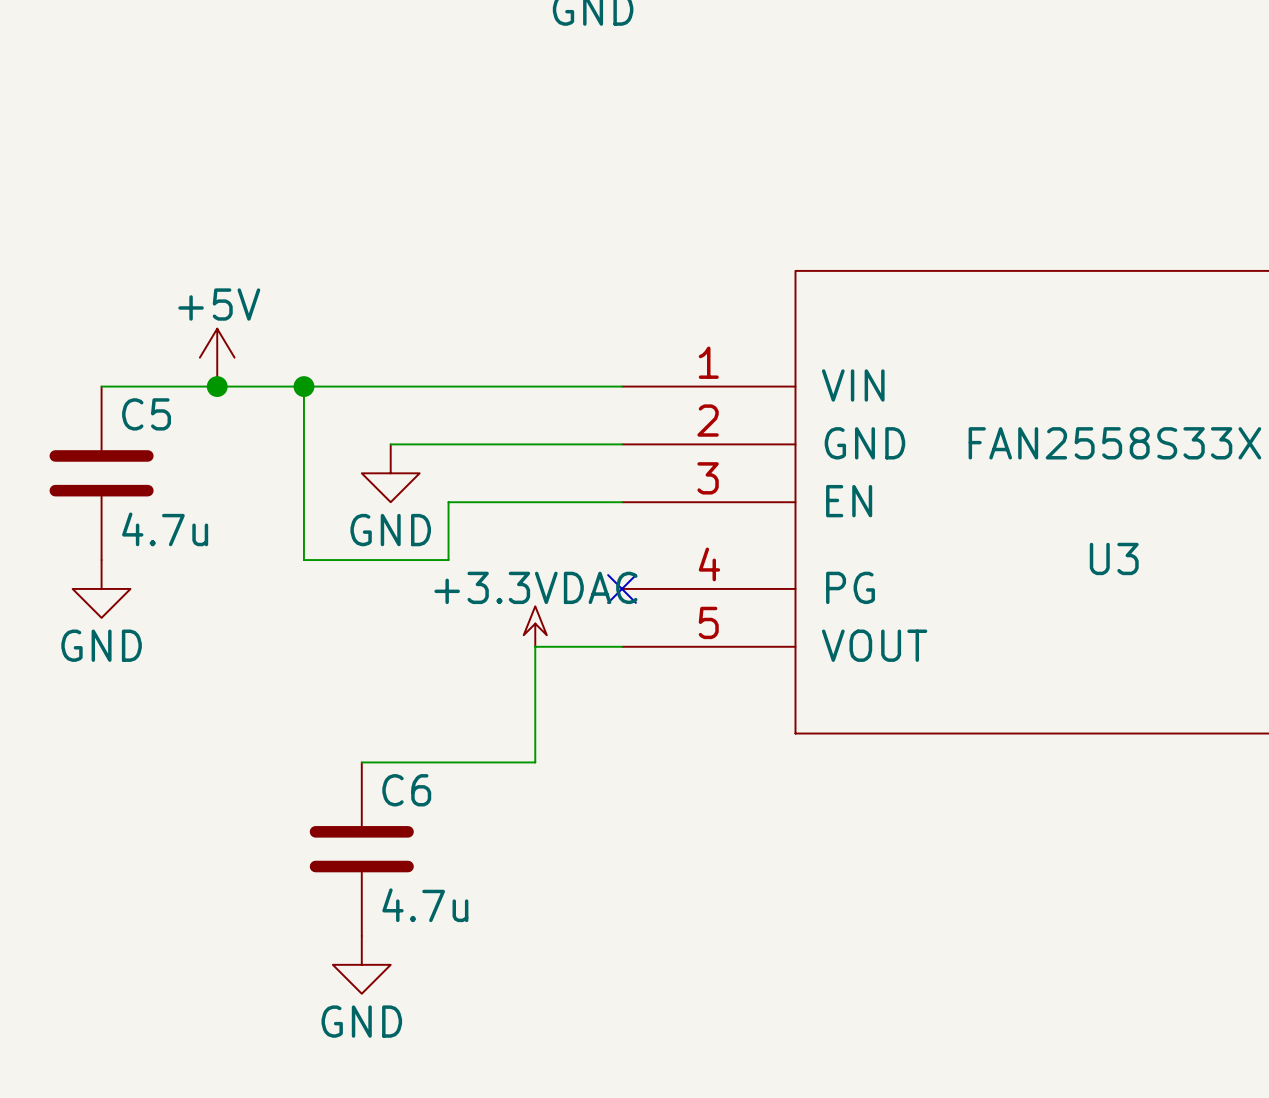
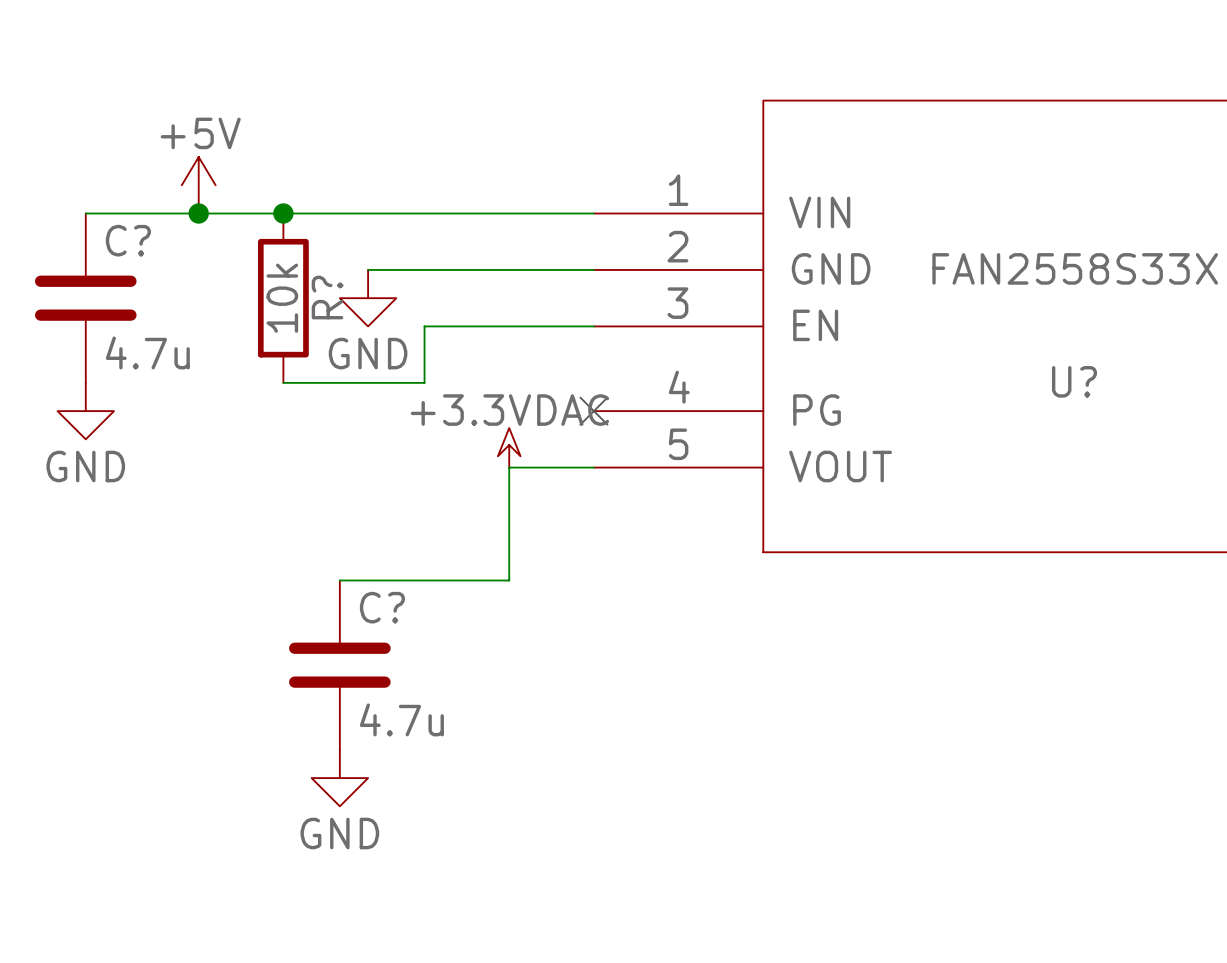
wire: (303, 386) (303, 560) -> none
C5 name: C5 (146, 414) -> C? (128, 240)
R?: none -> 10k (283, 298)
U3 name: U3 (1114, 558) -> U? (1074, 381)
C6 name: C6 (406, 790) -> C? (382, 607)

